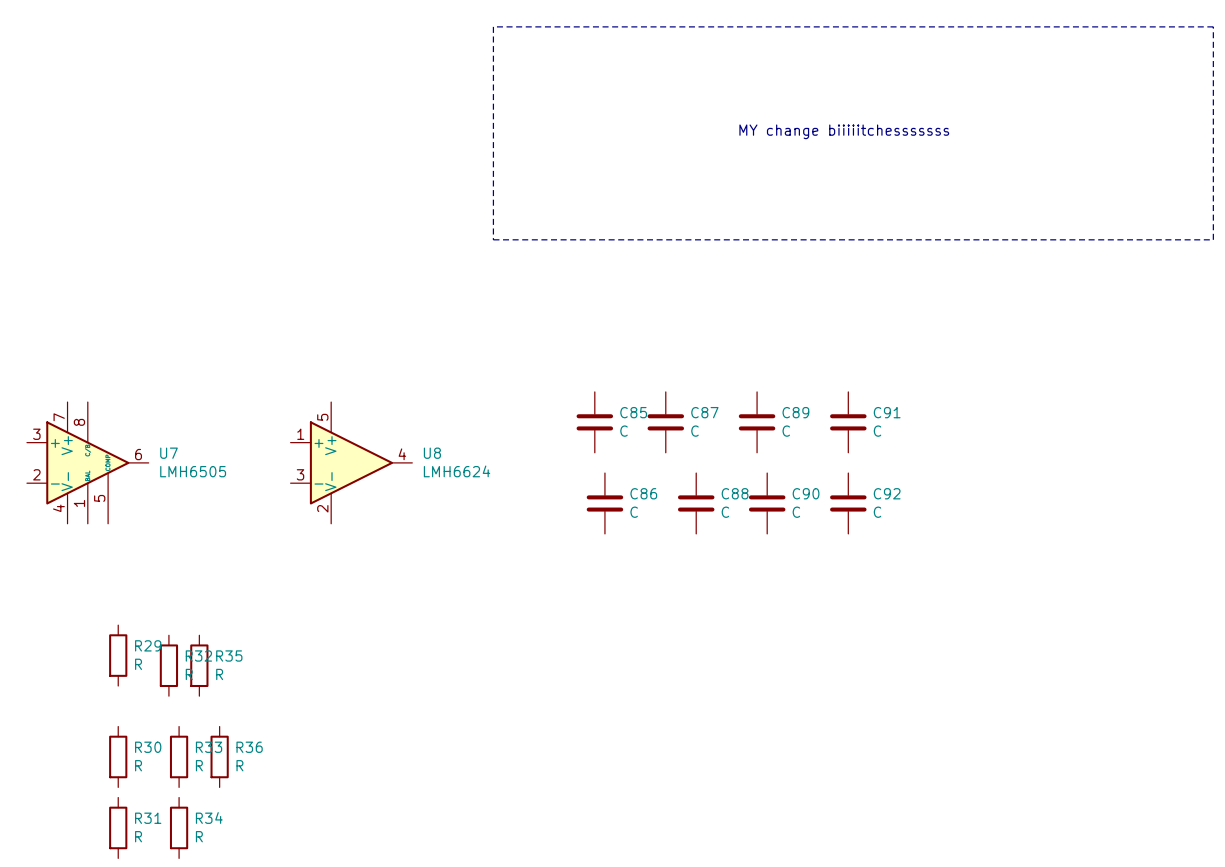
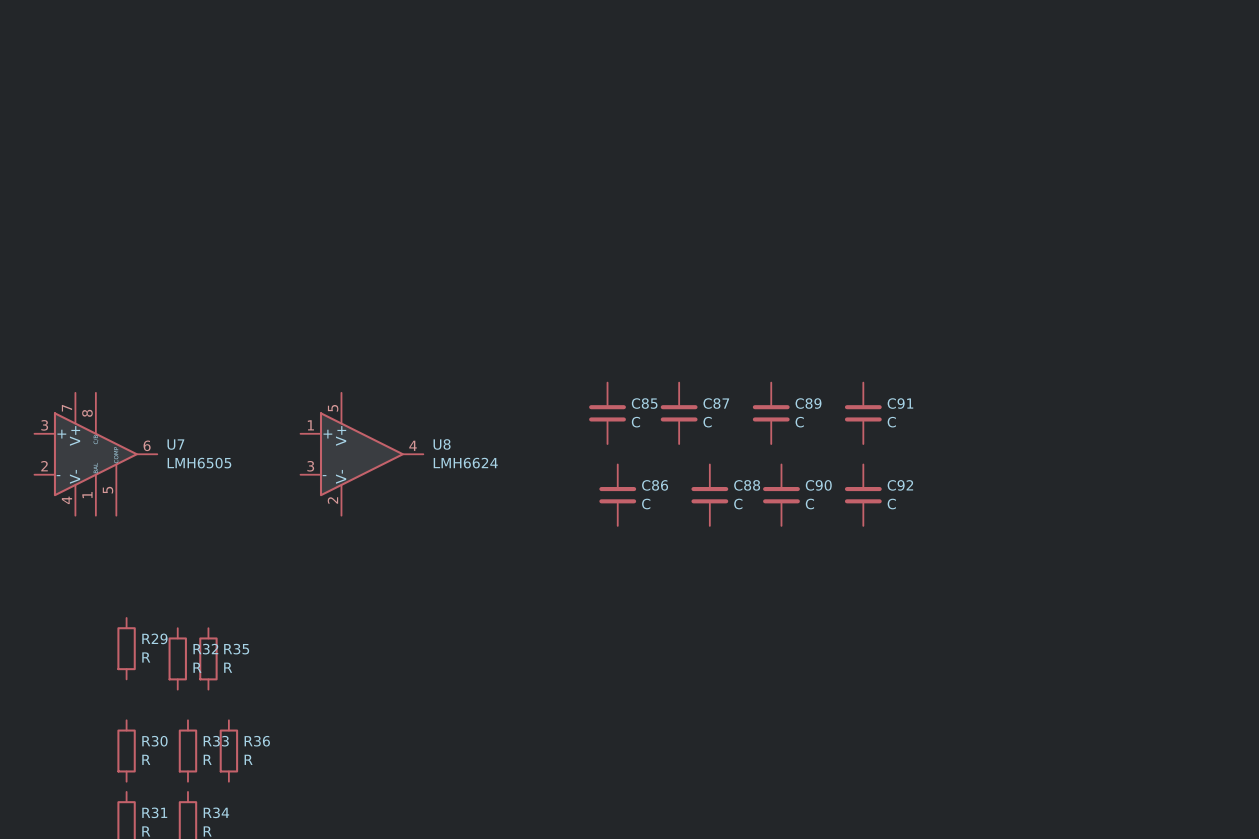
line: (493, 26) (493, 239) (1213, 239) (1213, 26) (493, 26) -> none
text: MY change biiiiitchesssssss (844, 131) -> none

